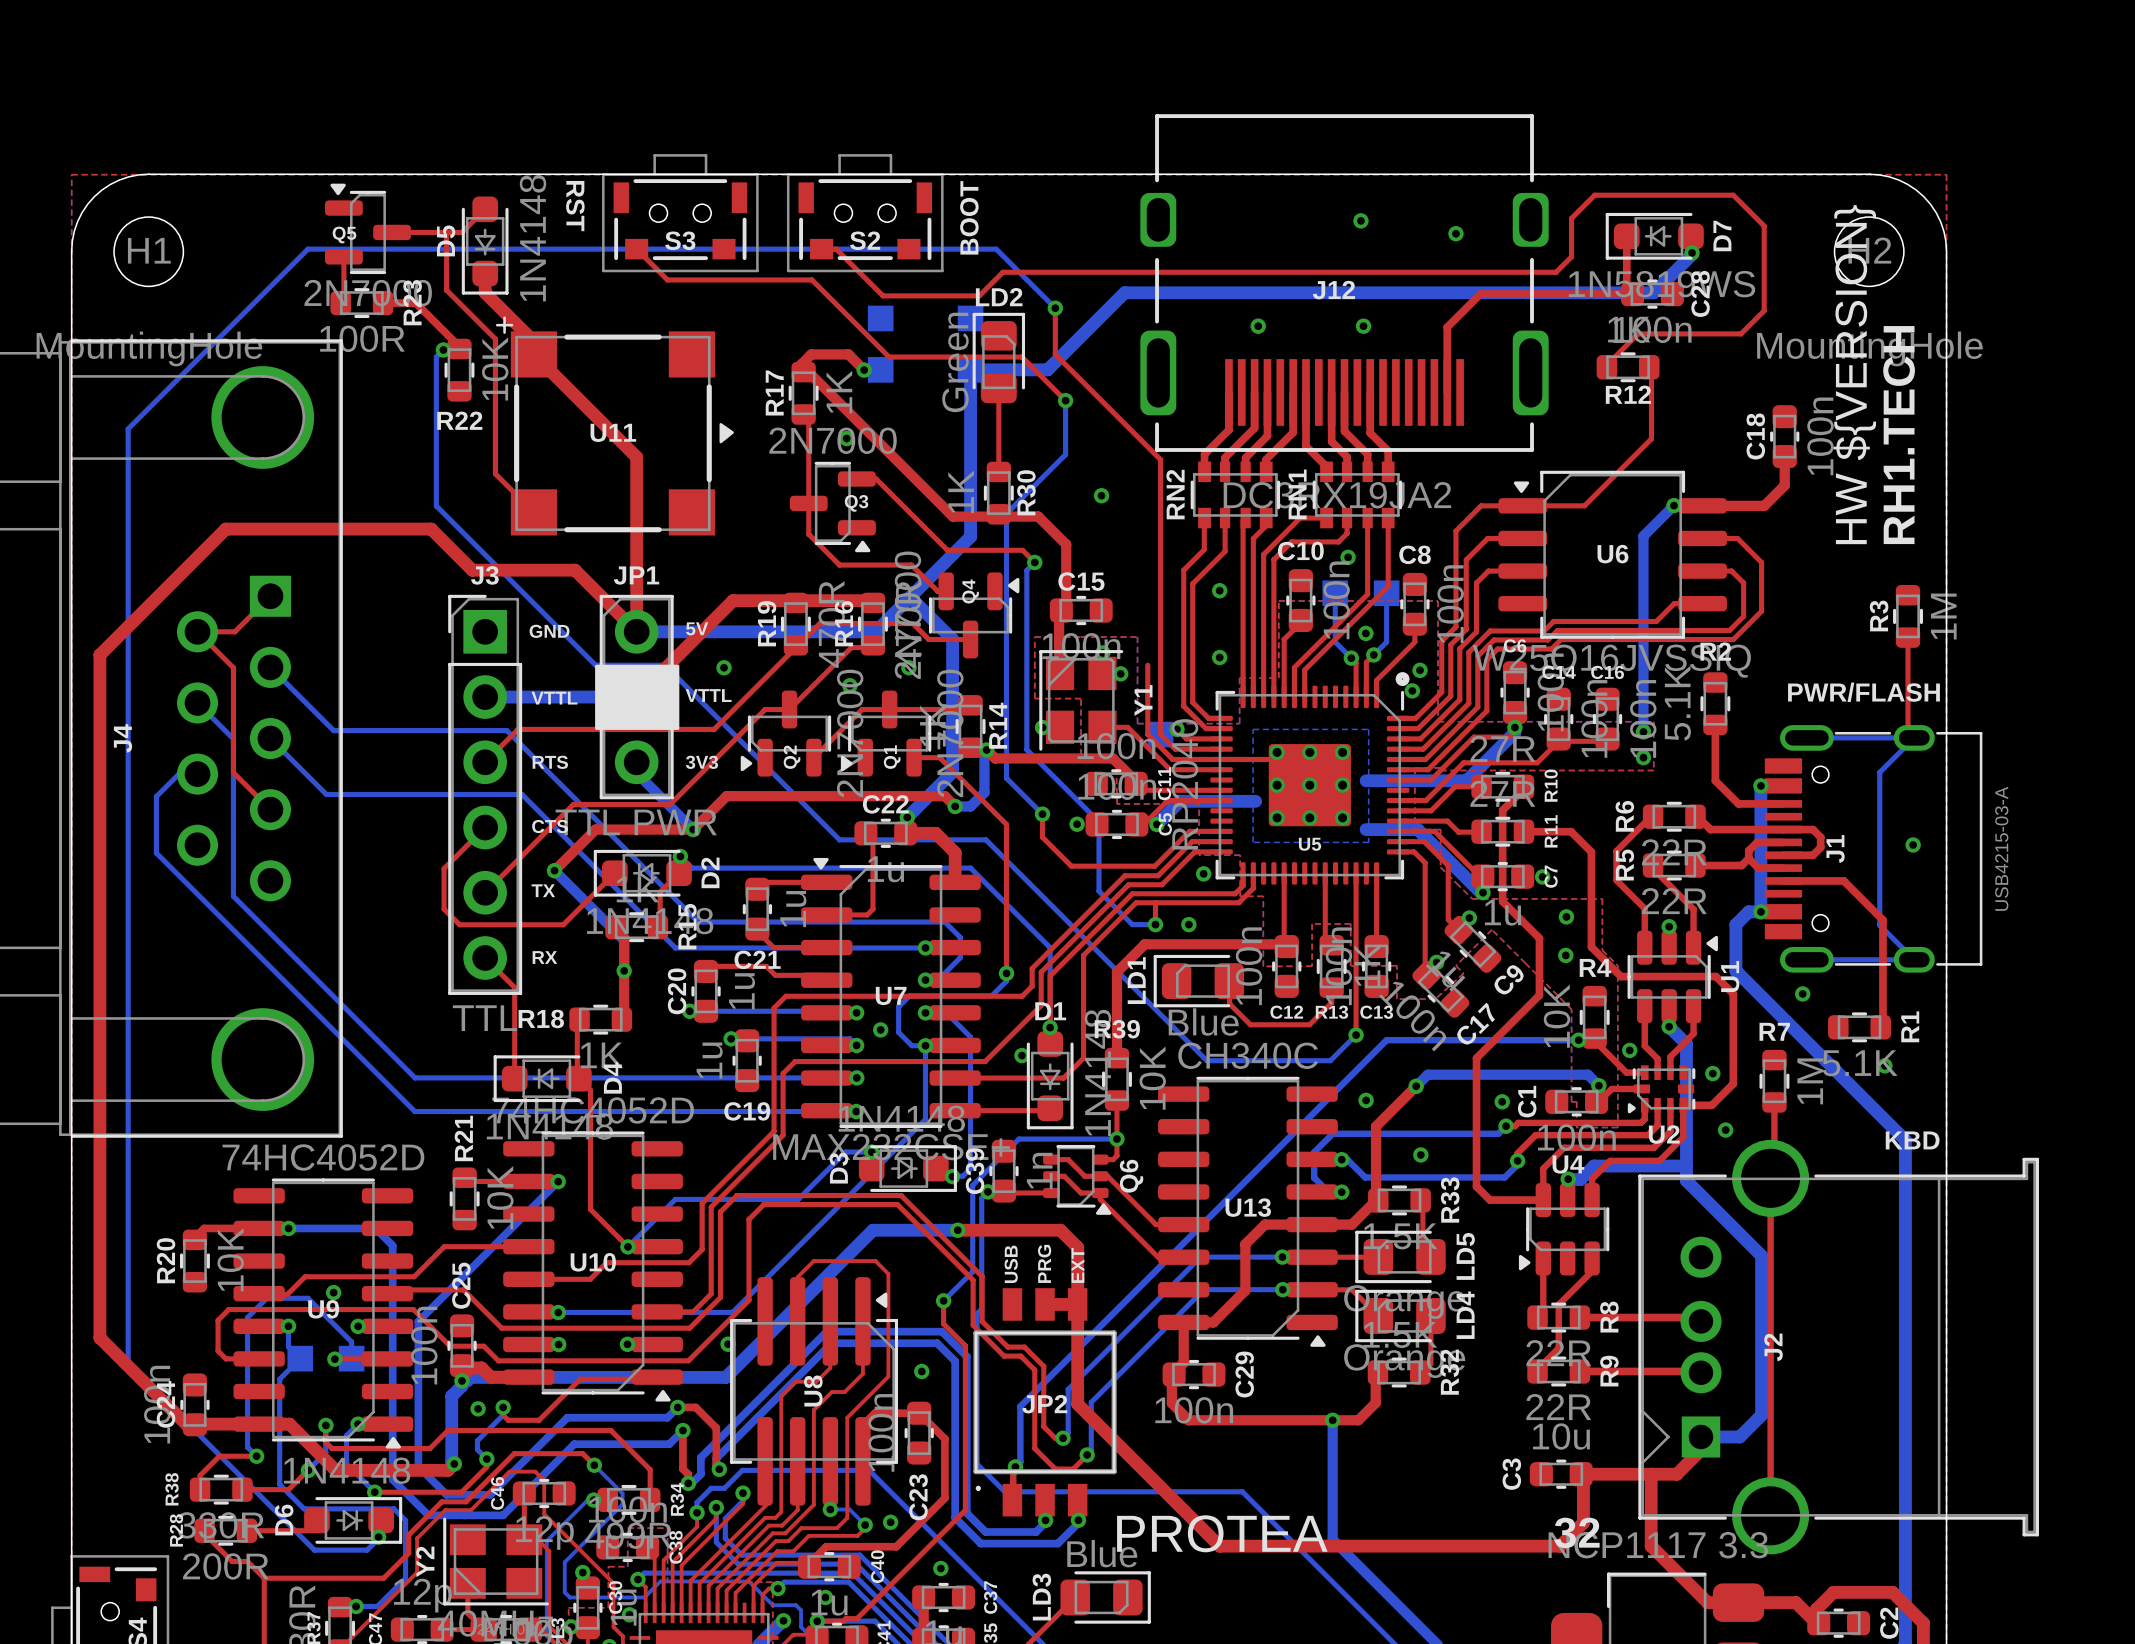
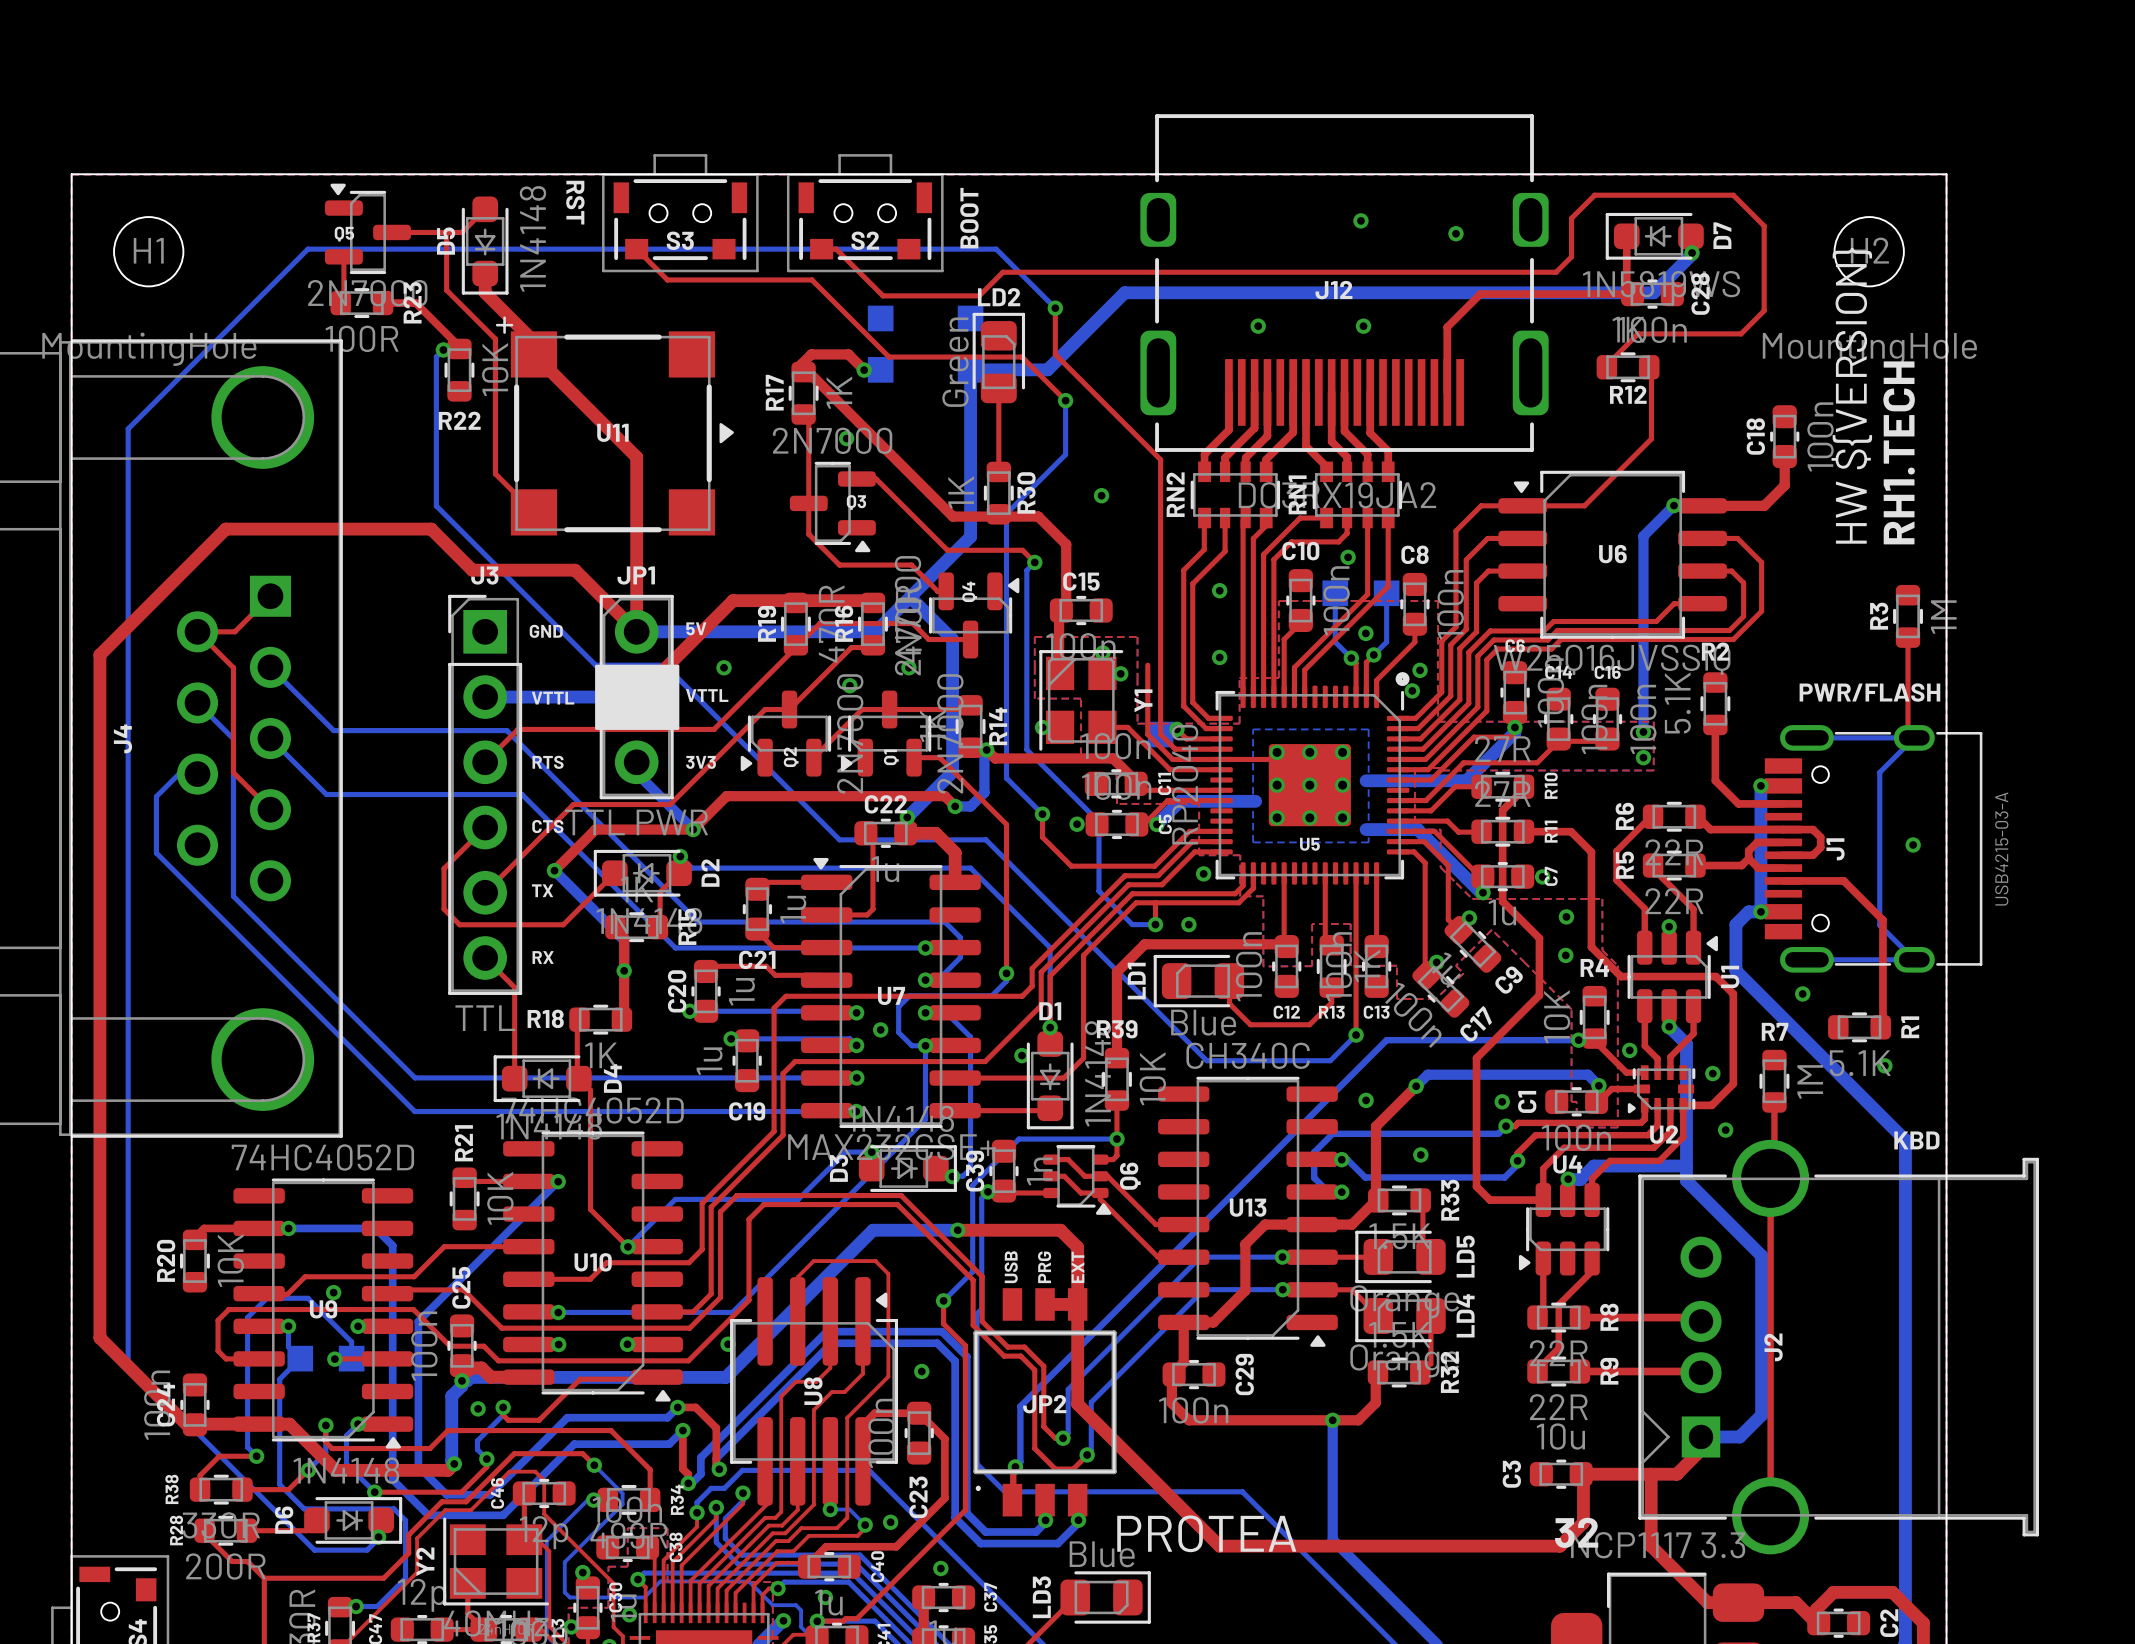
board edge: (148, 174) (119, 180) (94, 196) (77, 221) (71, 251) -> (148, 174) (71, 174) (71, 251)
board edge: (1869, 174) (1898, 180) (1923, 196) (1940, 221) (1946, 251) -> (1869, 174) (1946, 174) (1946, 251)

